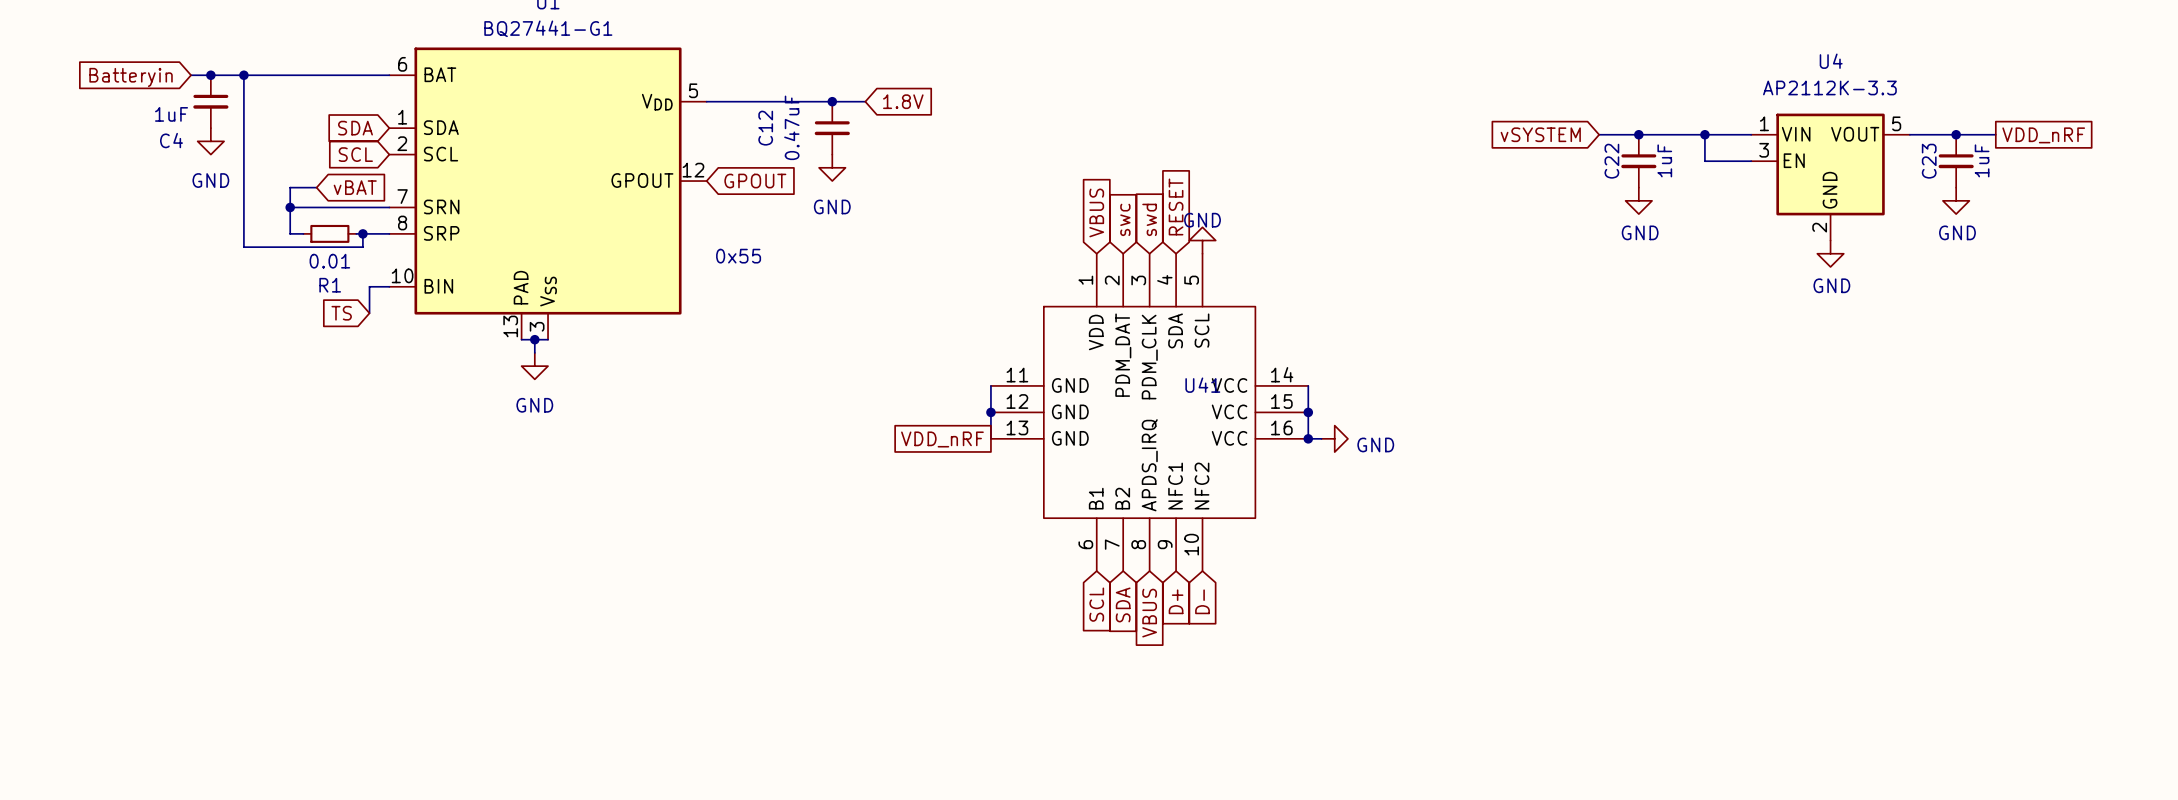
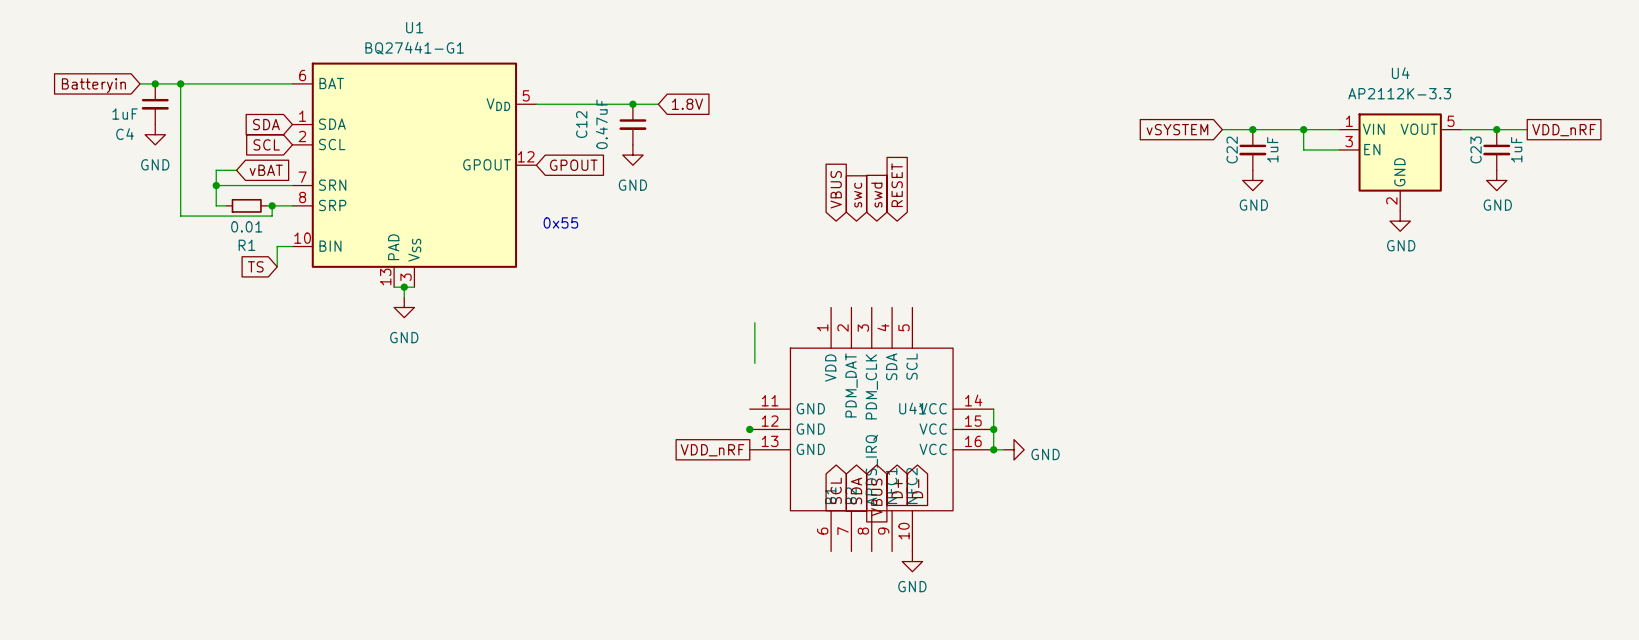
power symbol: GND (1202, 240) -> none
wire: (1308, 385) (1308, 438) (1321, 438) -> (993, 409) (993, 449) (1003, 449)
junction: (990, 412) -> none
U41 position: (1149, 412) -> (871, 429)
junction: (1308, 412) -> none
junction: (1308, 438) -> none
power symbol position: GND (1334, 438) -> GND (1014, 449)
global label position: VDD_nRF (942, 439) -> VDD_nRF (712, 450)
junction: none -> (749, 429)
junction: none -> (993, 429)
junction: none -> (993, 449)
power symbol: none -> GND (912, 561)

